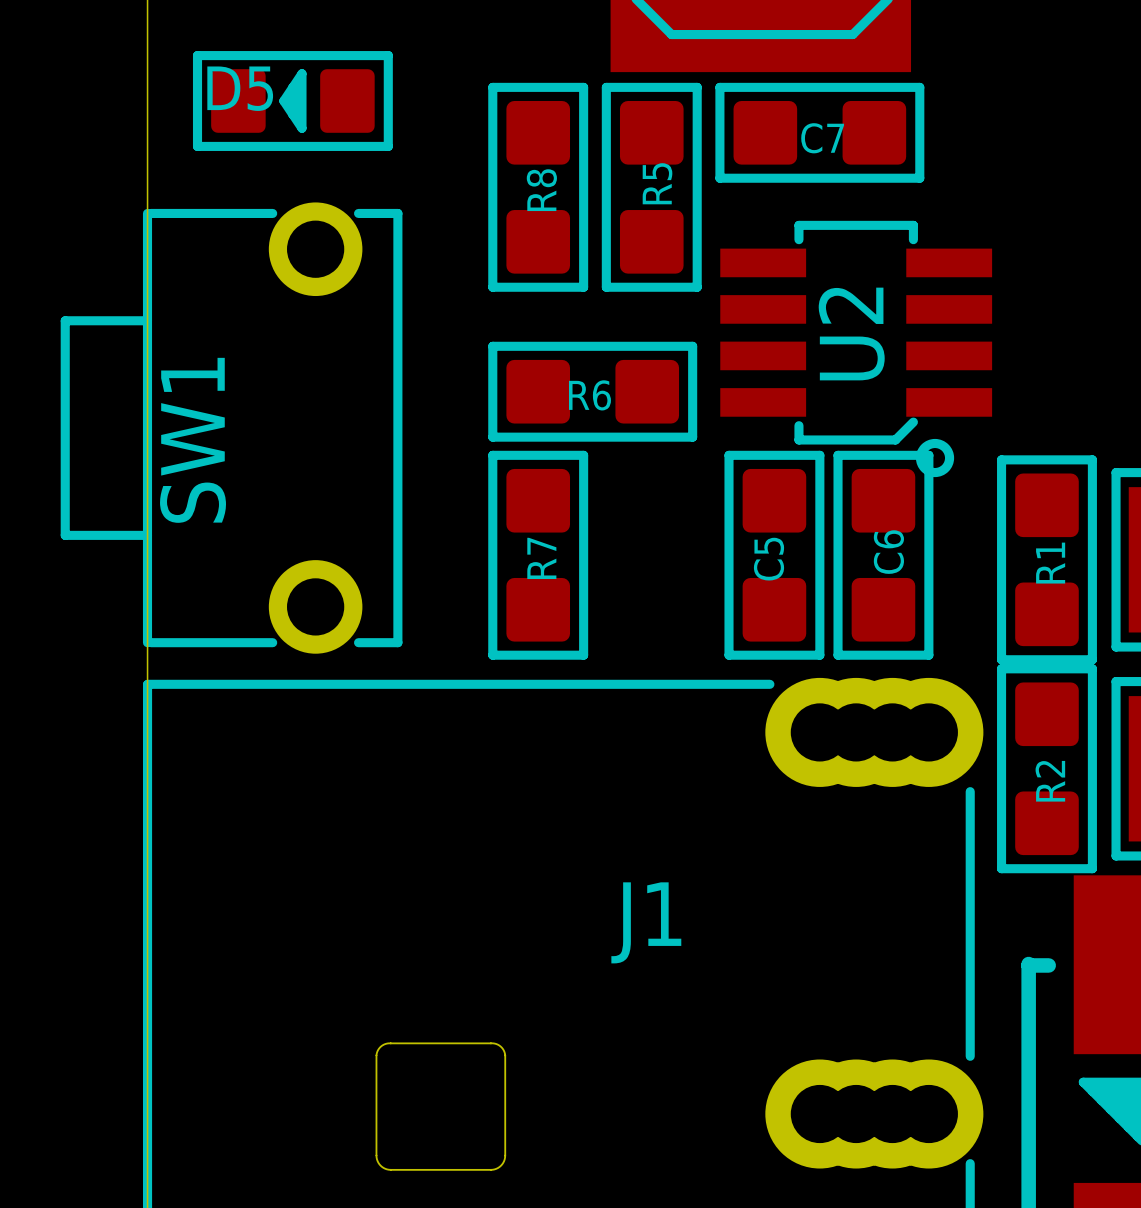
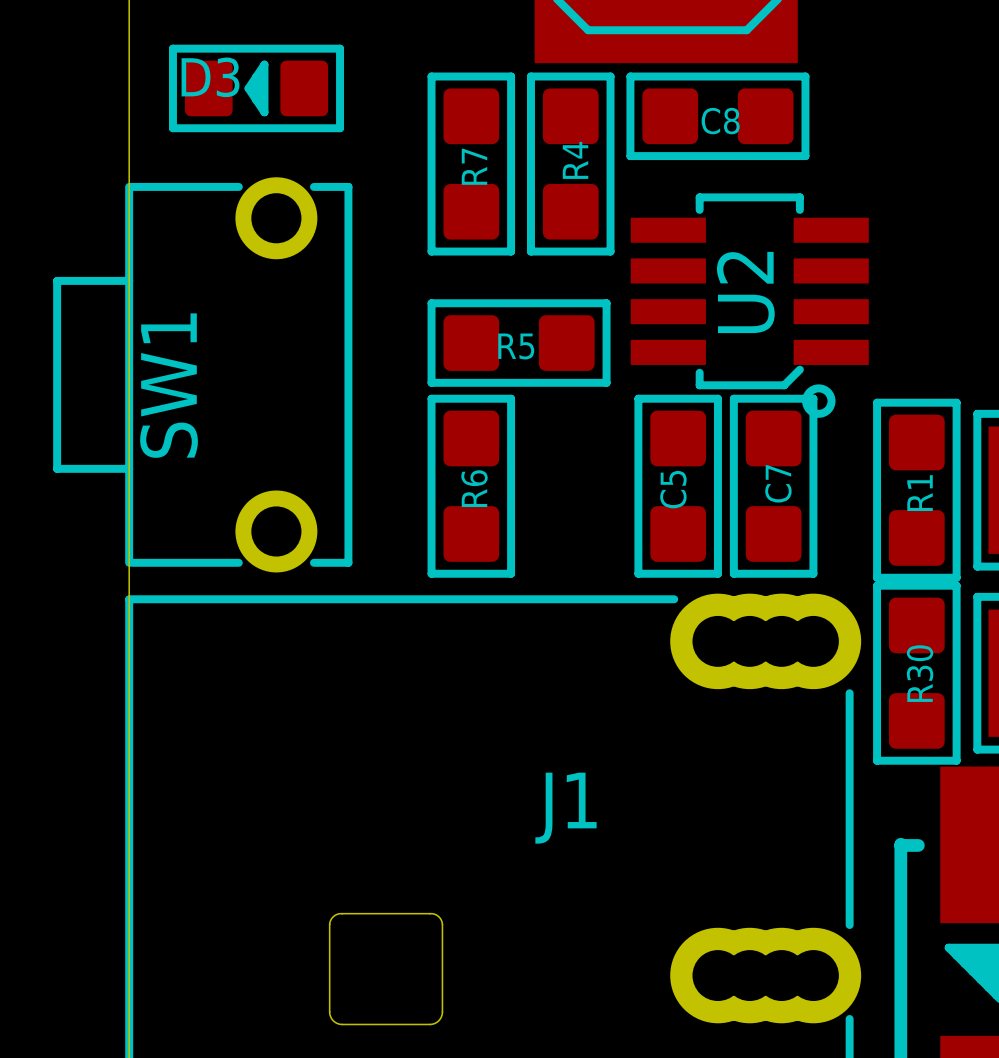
D5 name: D5 (240, 88) -> D3 (210, 77)
C7 name: C7 (822, 138) -> C8 (720, 121)
R5 name: R5 (657, 183) -> R4 (575, 160)
R8 name: R8 (541, 190) -> R7 (474, 166)
R6 name: R6 (589, 395) -> R5 (516, 346)
C6 name: C6 (888, 552) -> C7 (778, 483)
R7 name: R7 (541, 558) -> R6 (474, 488)
R2 name: R2 (1050, 781) -> R30 (920, 673)

